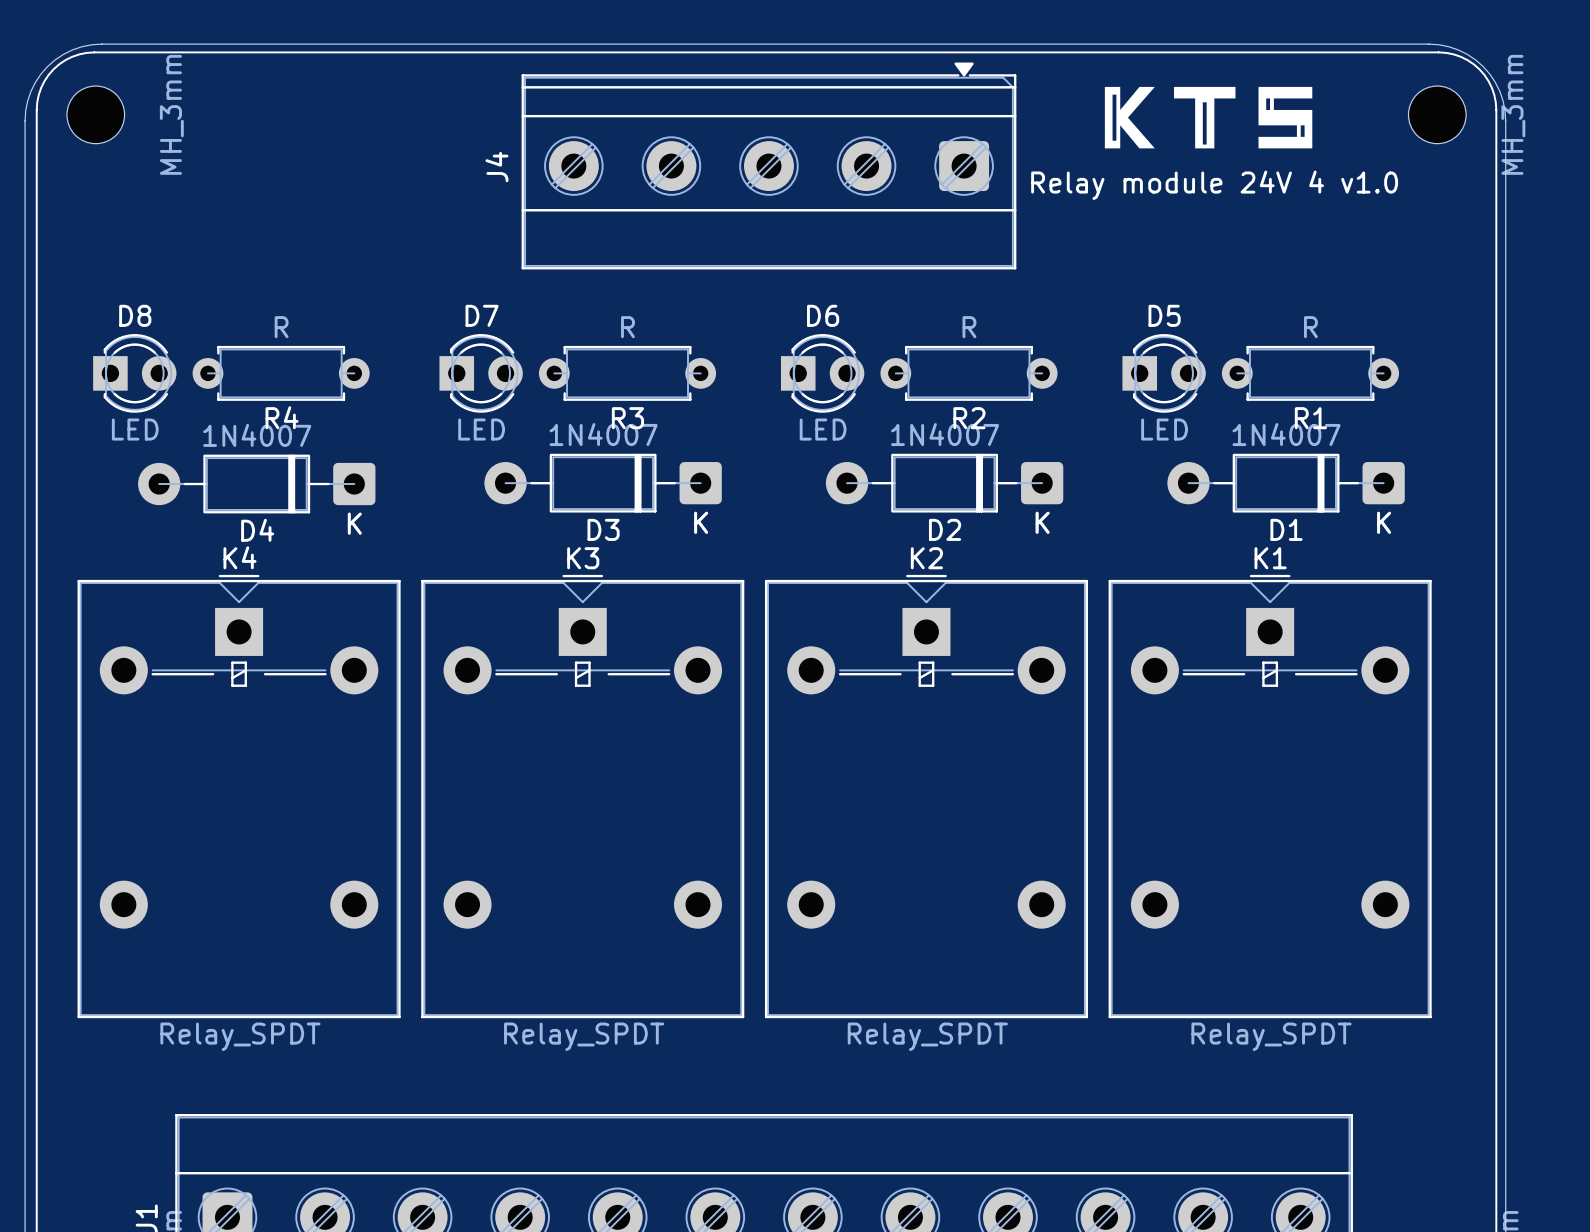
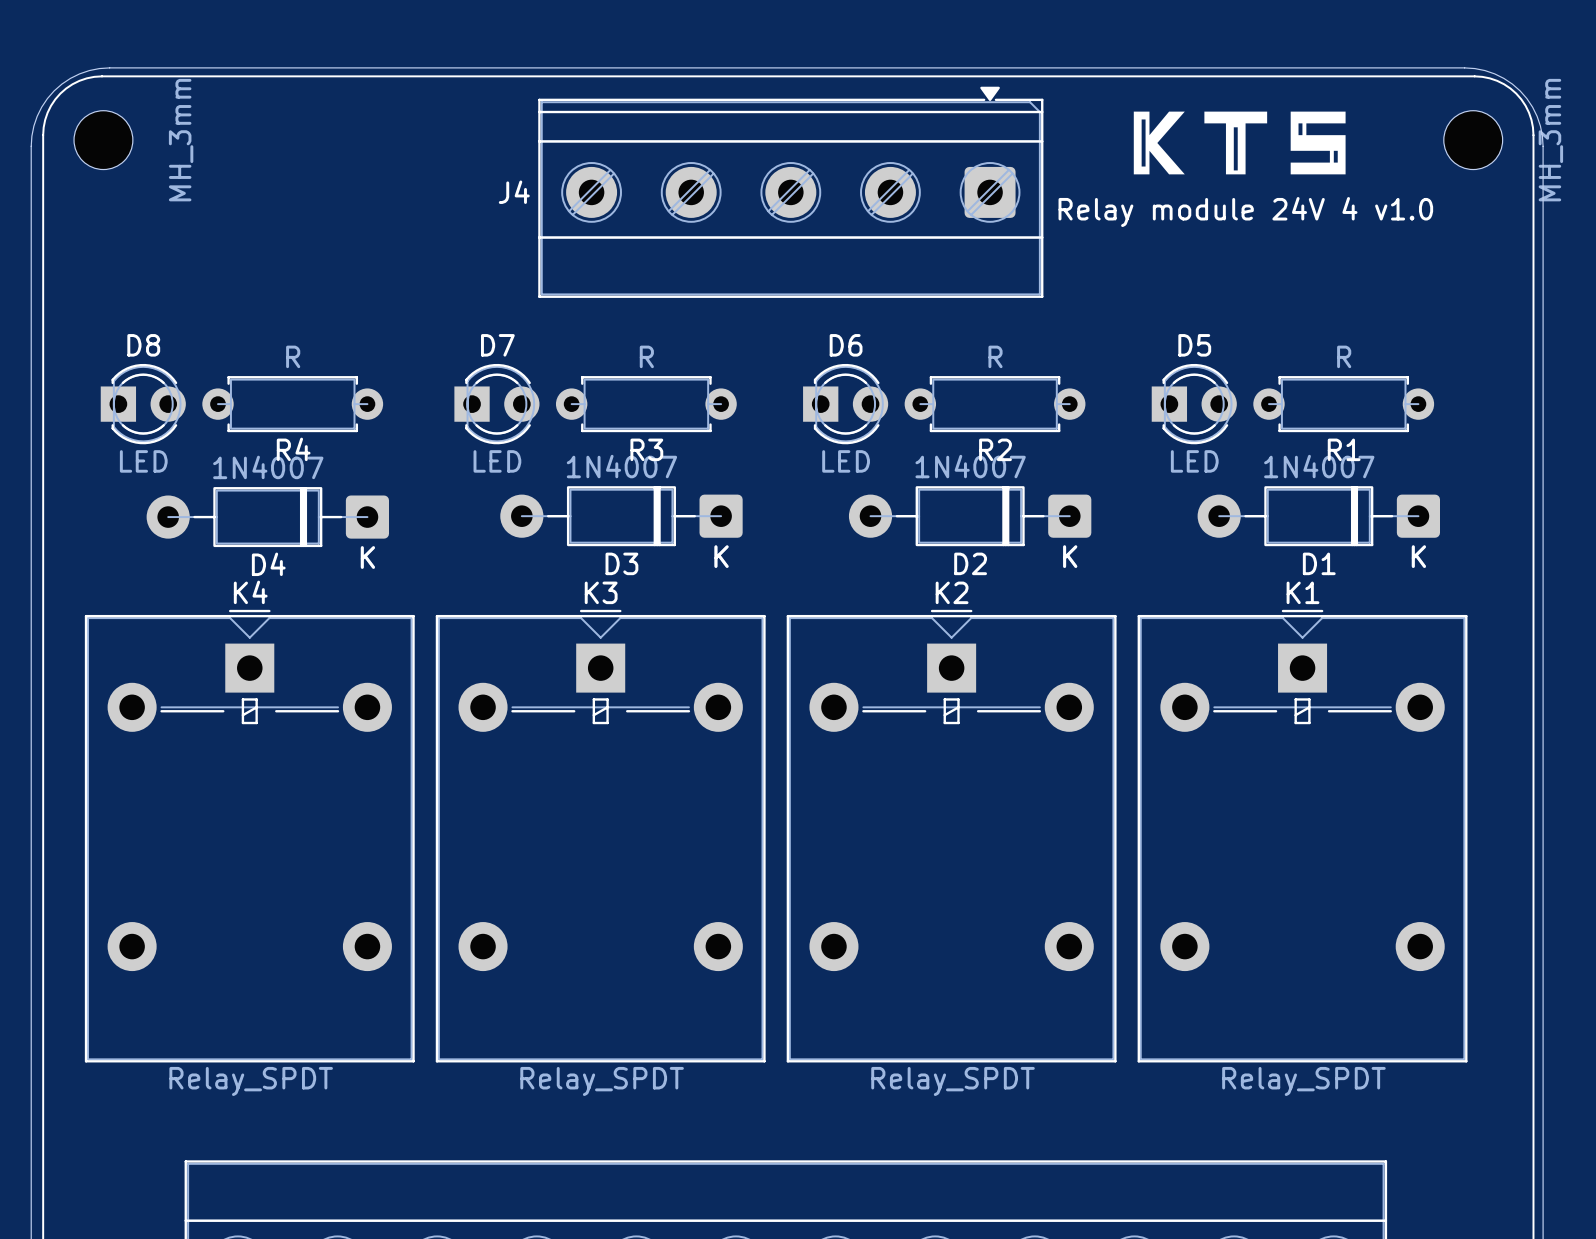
J4 name rotation: 0° (496, 167) -> 90° clockwise (514, 192)

